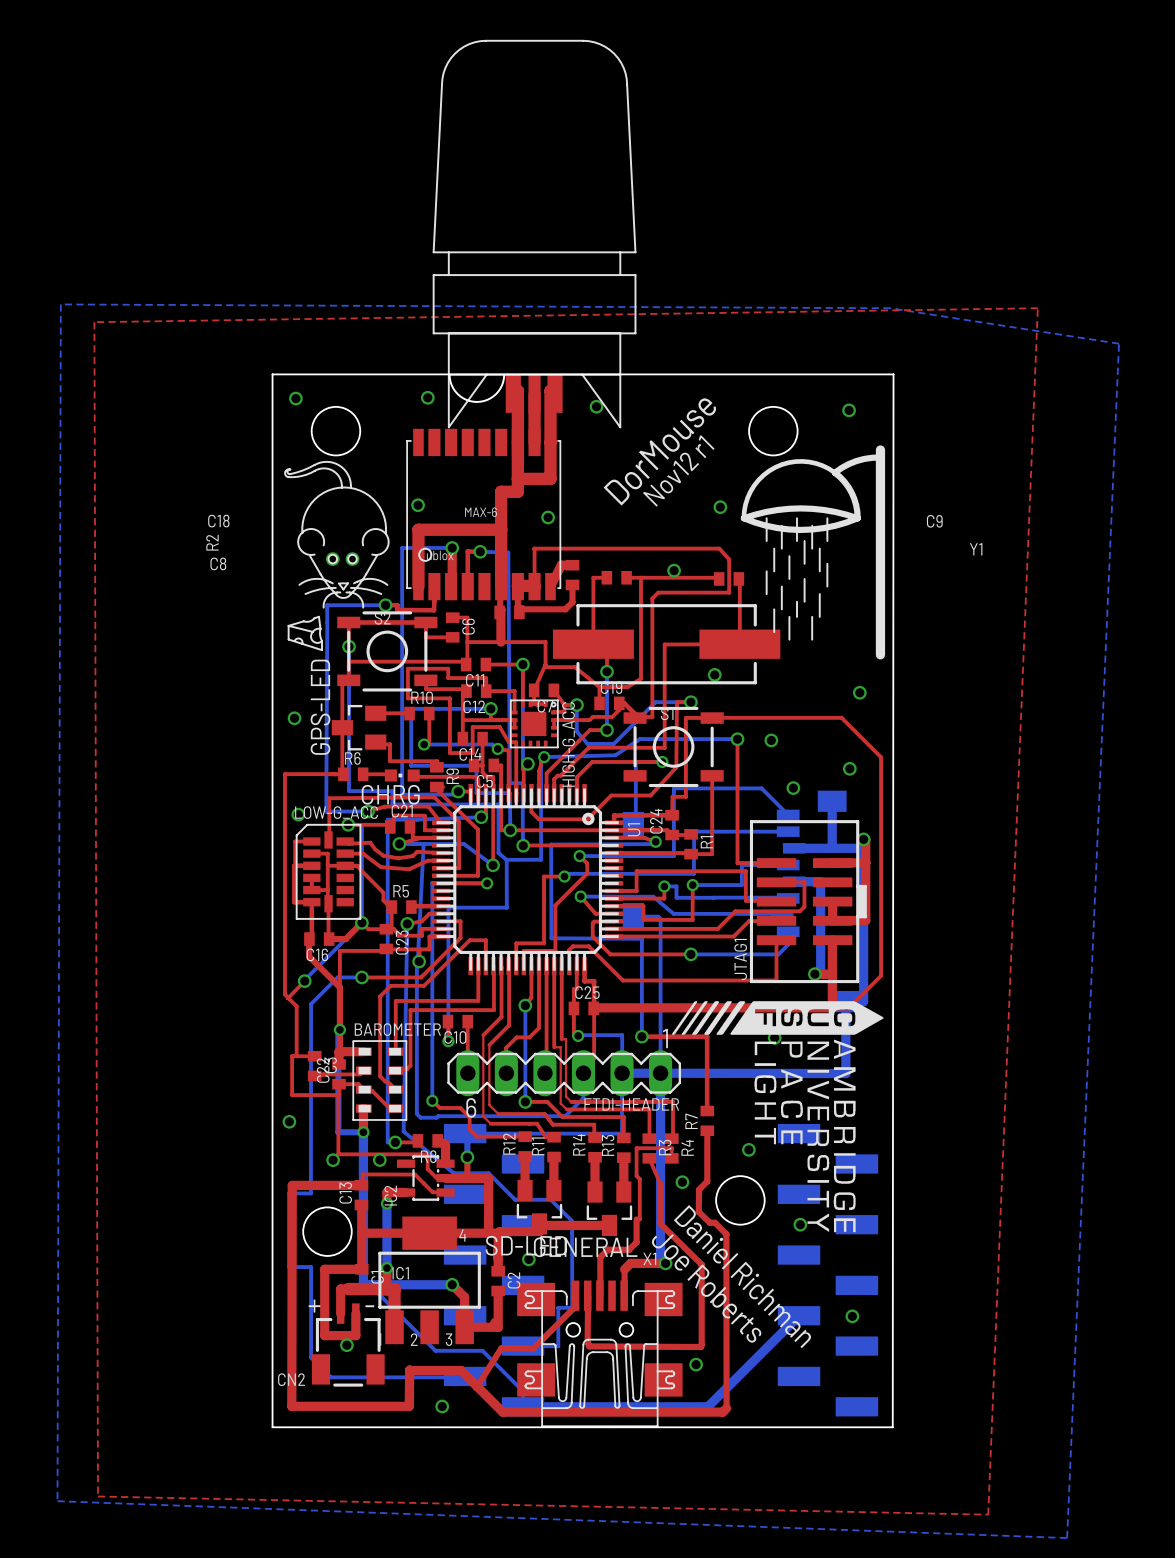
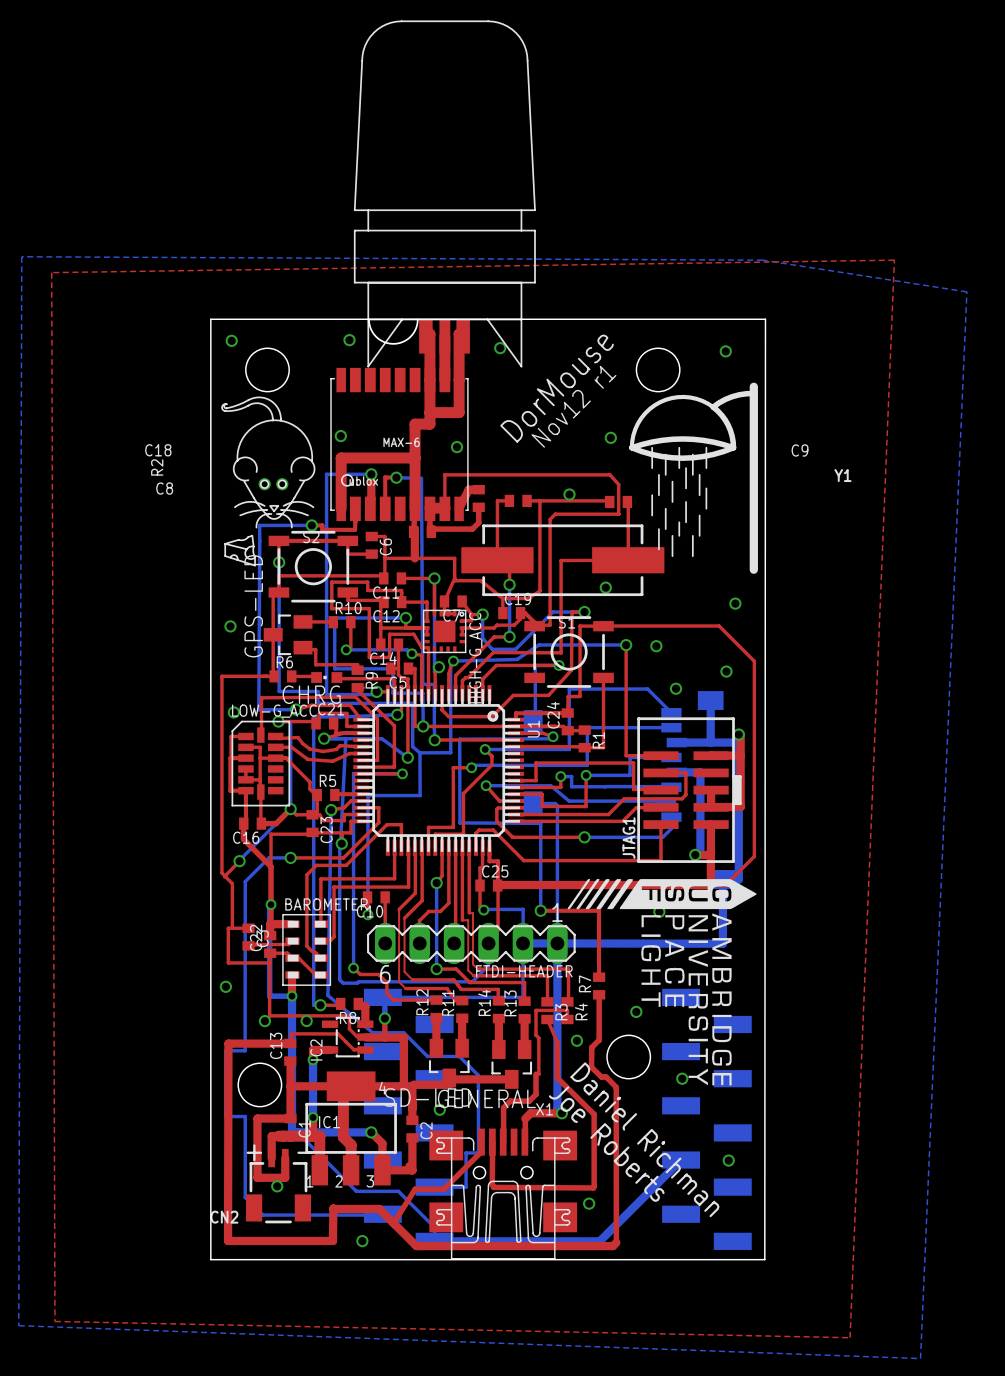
top track: none -> (351, 1086) (343, 1094) (343, 1137) (351, 1144) (351, 1170)

